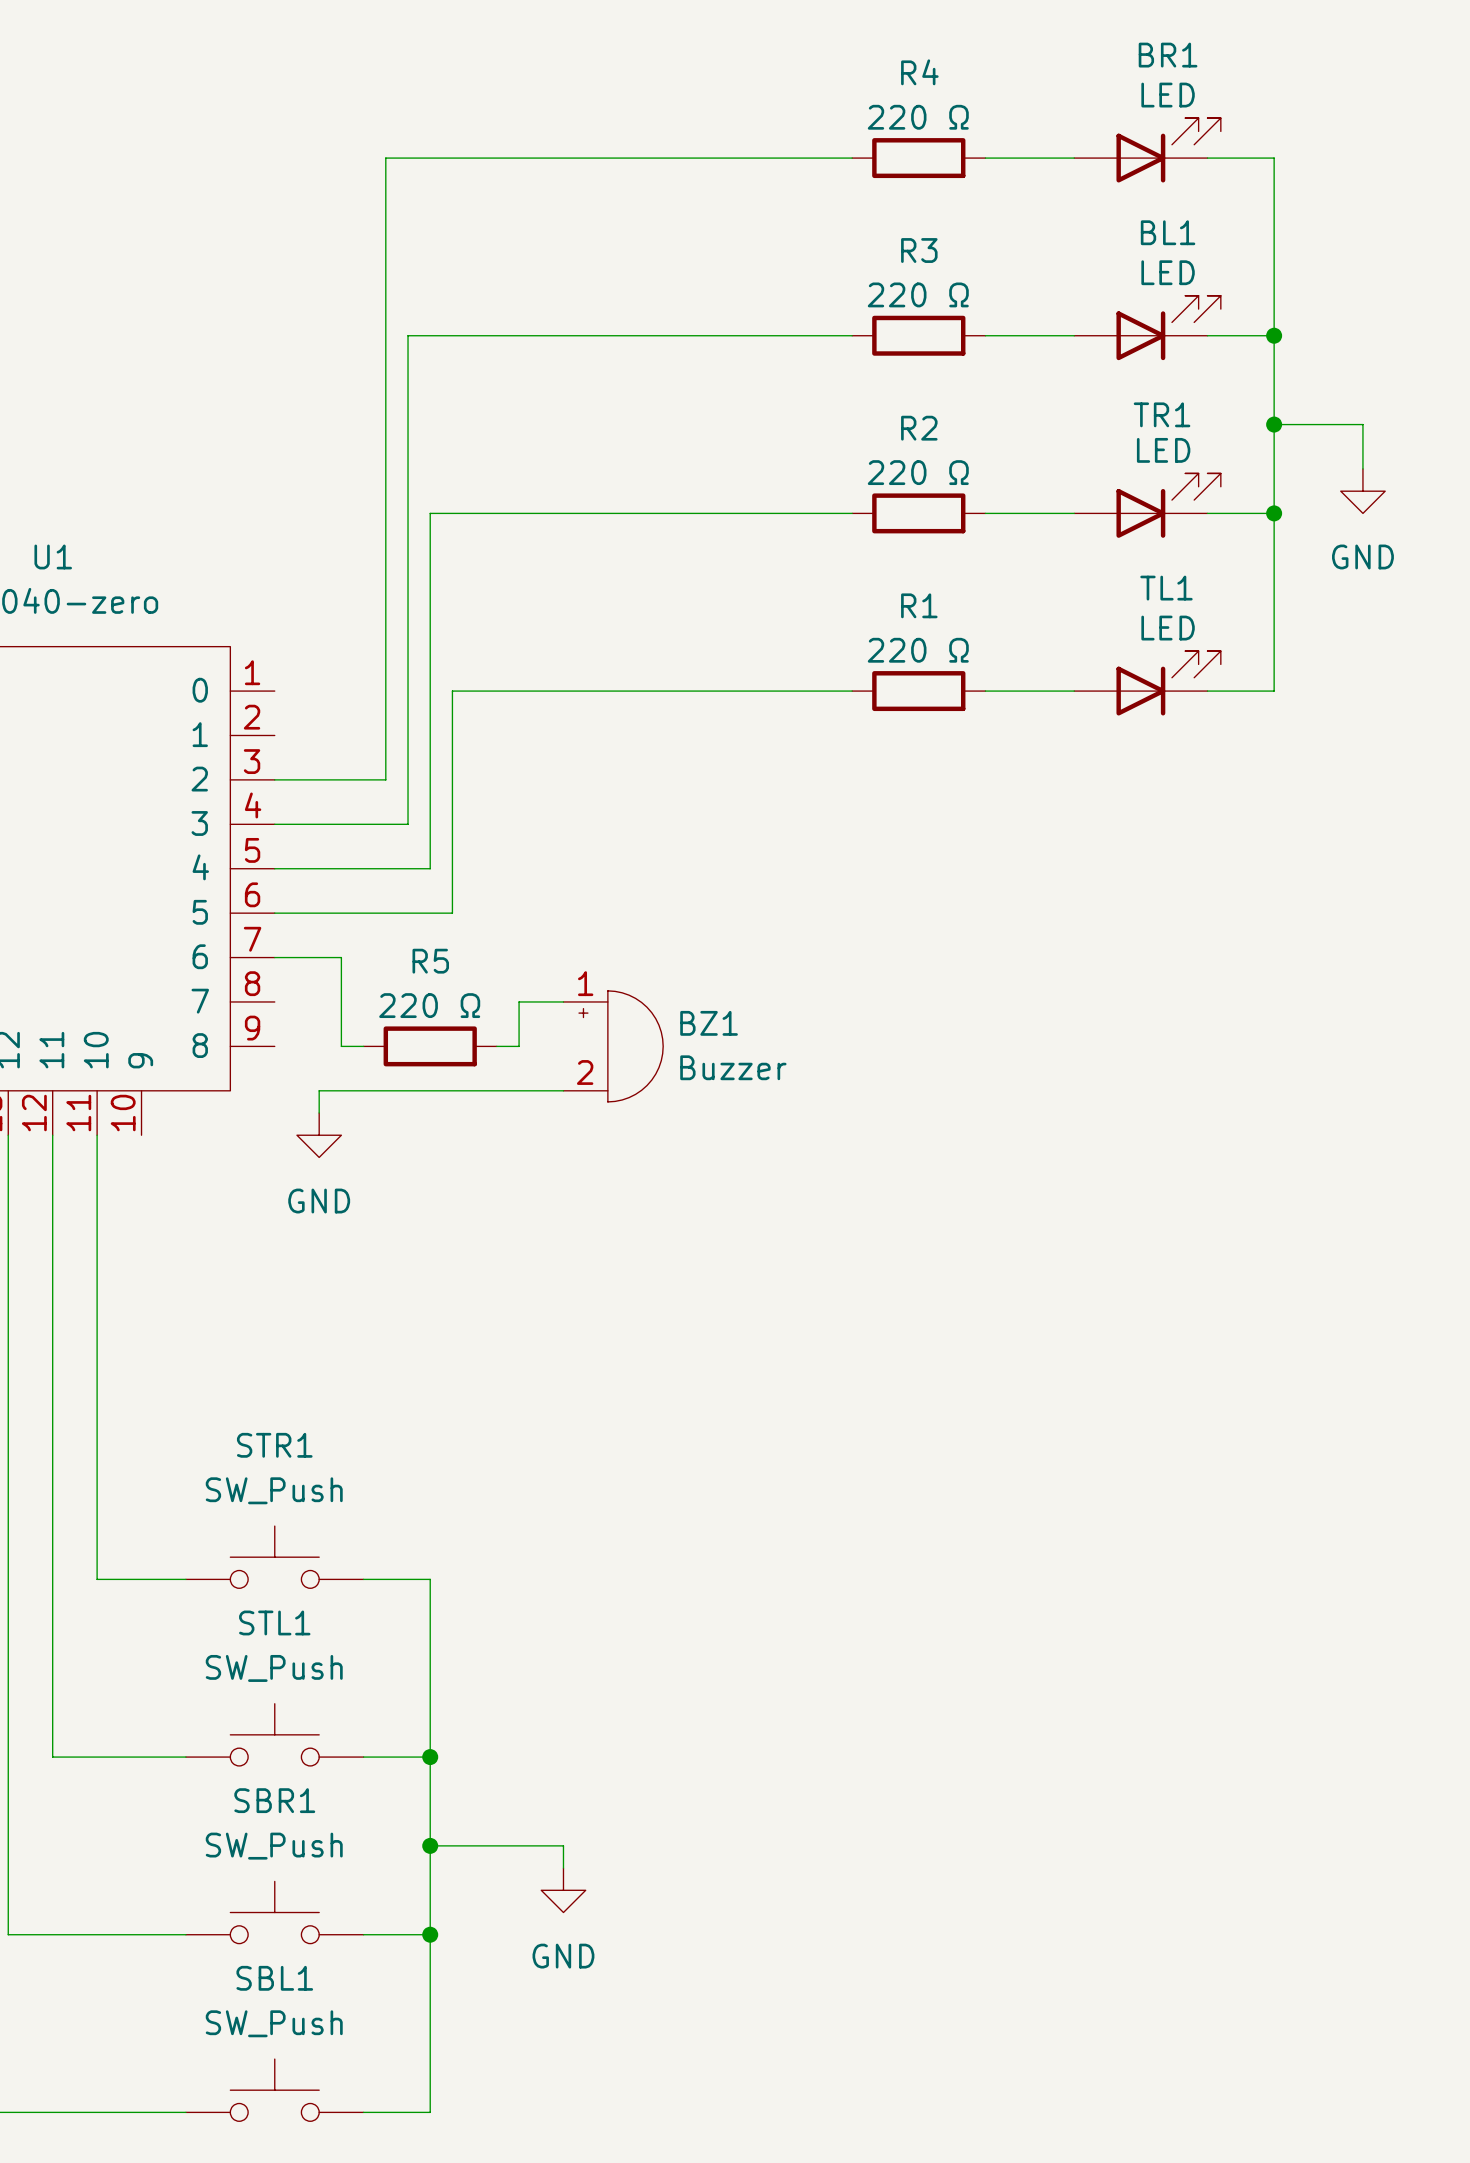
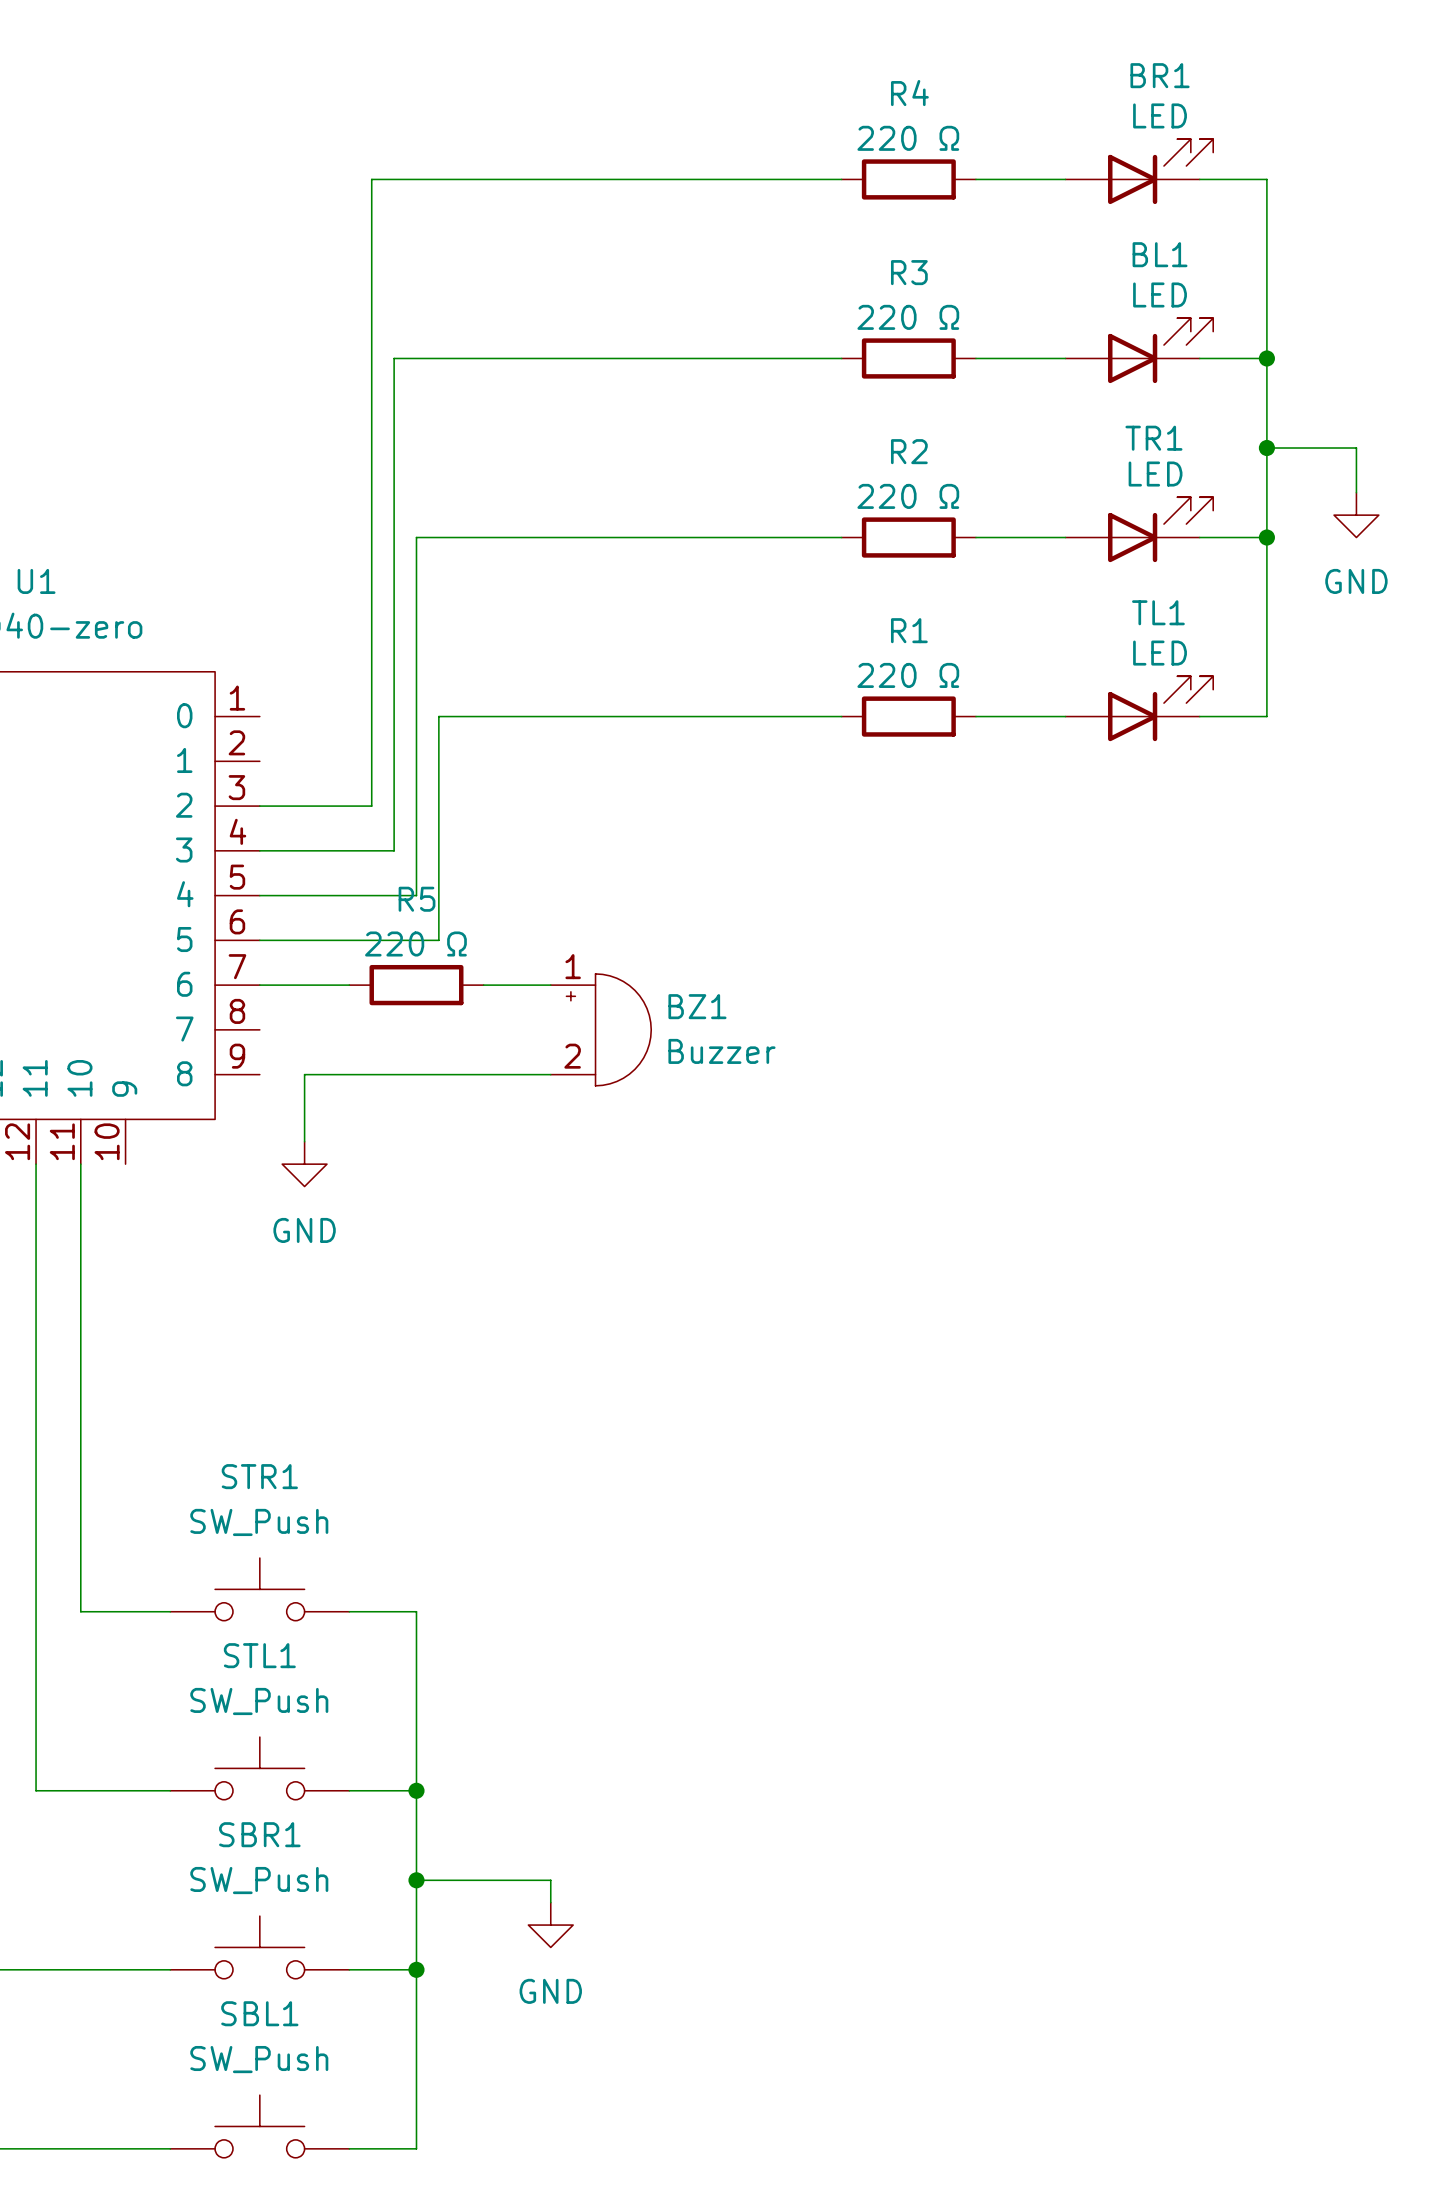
wire: (341, 957) (341, 1046) -> (326, 985) (349, 985)
wire: none -> (483, 985) (550, 985)
wire: (563, 1001) (519, 1001) (519, 1046) -> (550, 1074) (506, 1074)
wire: none -> (349, 1074) (483, 1074)
R5 position: (430, 1046) -> (416, 985)
BZ1 position: (613, 1046) -> (601, 1029)
wire: (319, 1090) (563, 1090) -> (304, 1119) (304, 1074) (326, 1074)

